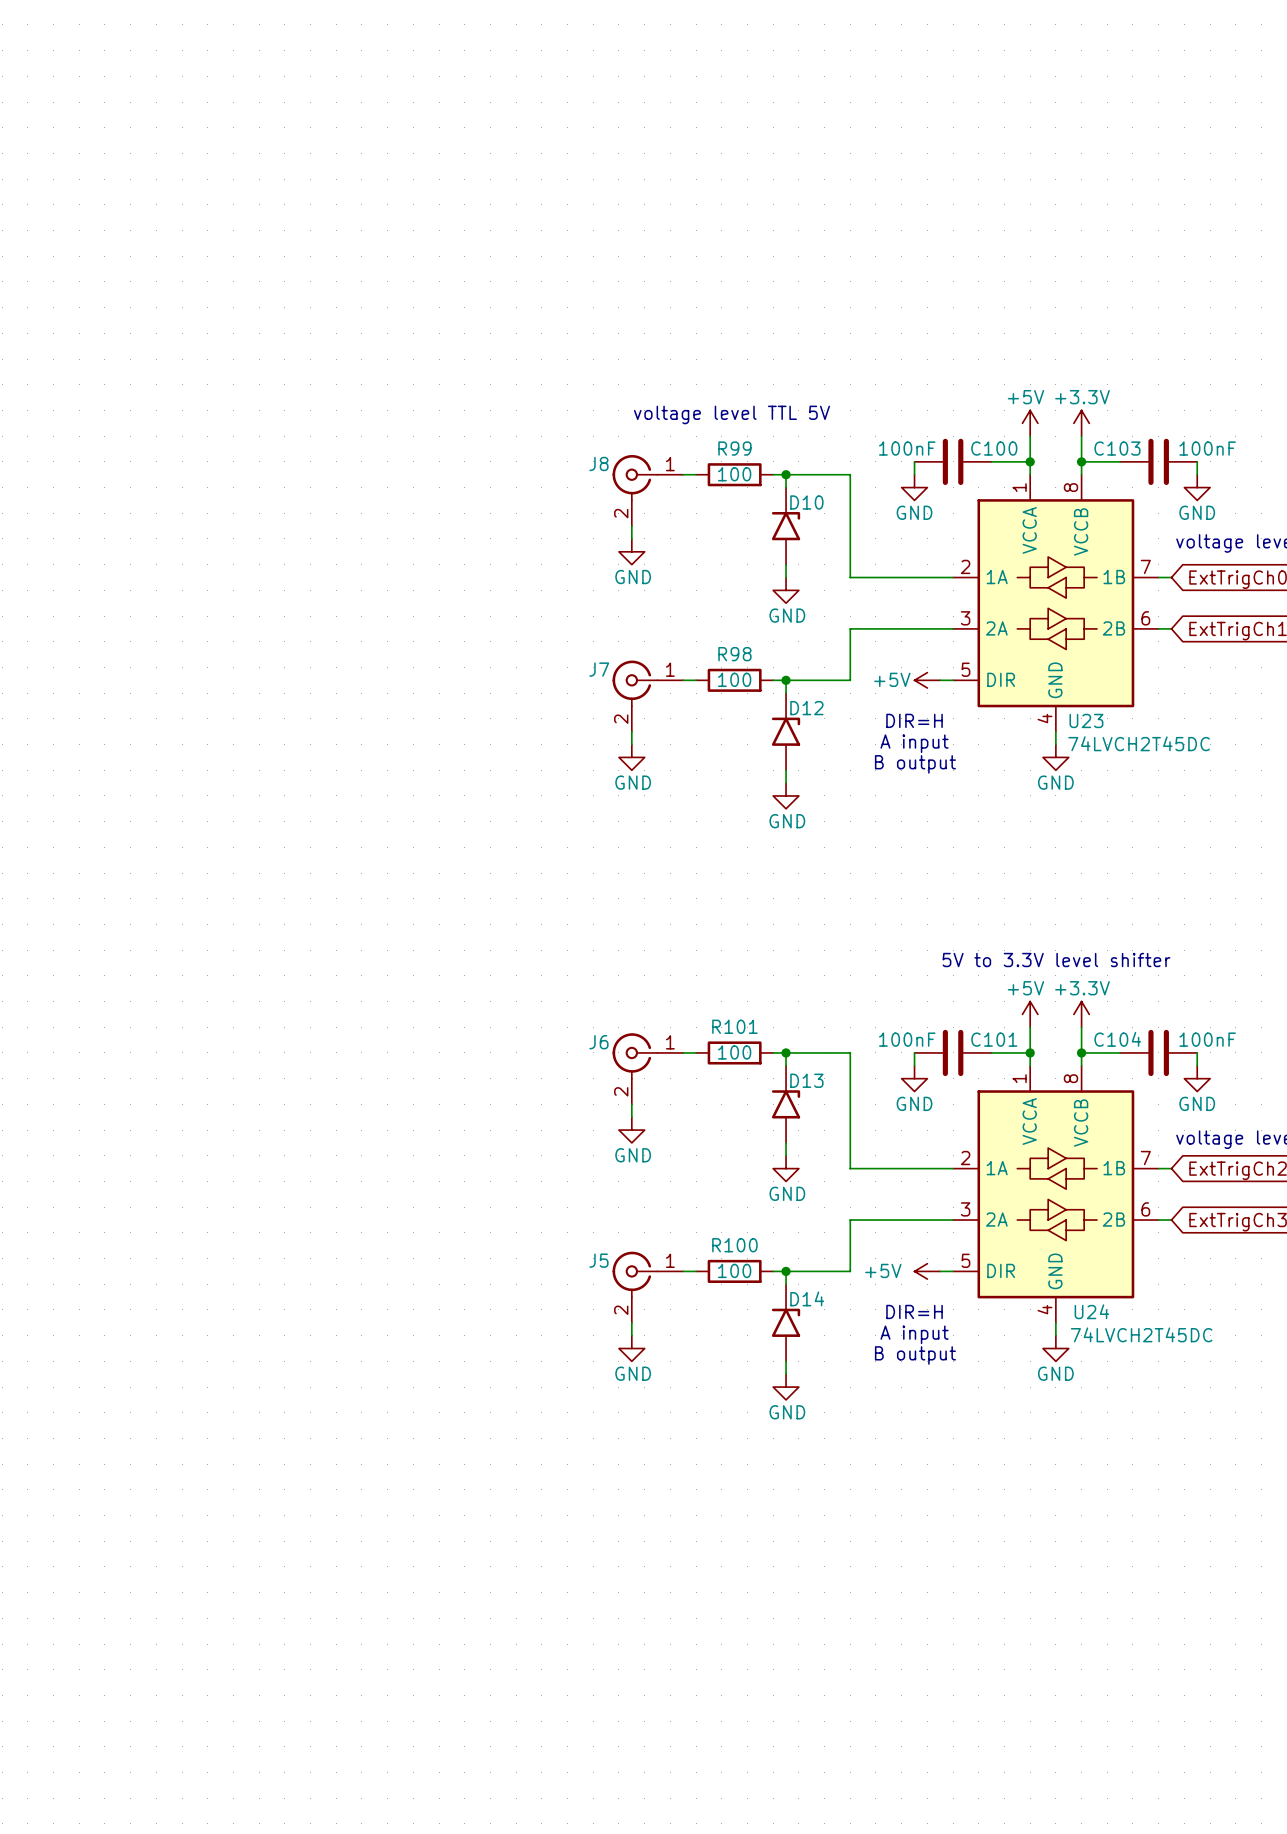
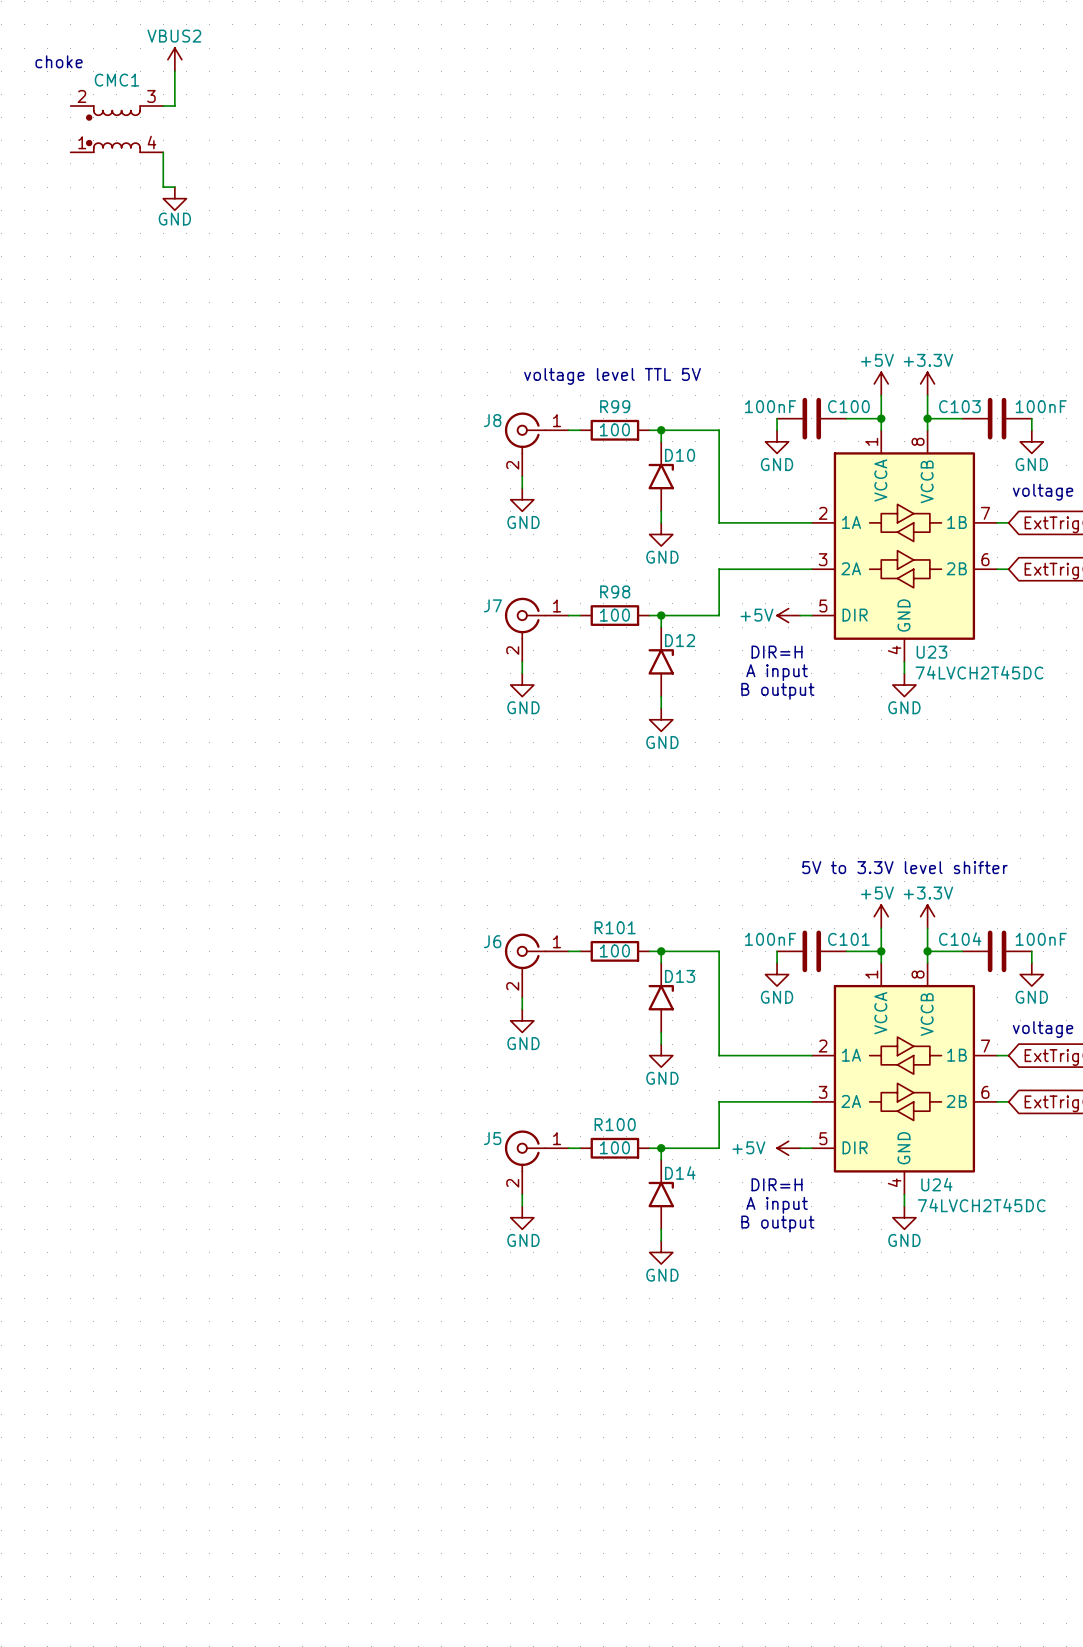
power symbol: none -> VBUS2 (174, 59)
text: none -> choke (59, 61)
wire: none -> (174, 71) (174, 106) (163, 106)
CMC1: none -> (116, 129)
wire: none -> (163, 152) (163, 187) (174, 187)
power symbol: none -> GND (174, 198)

